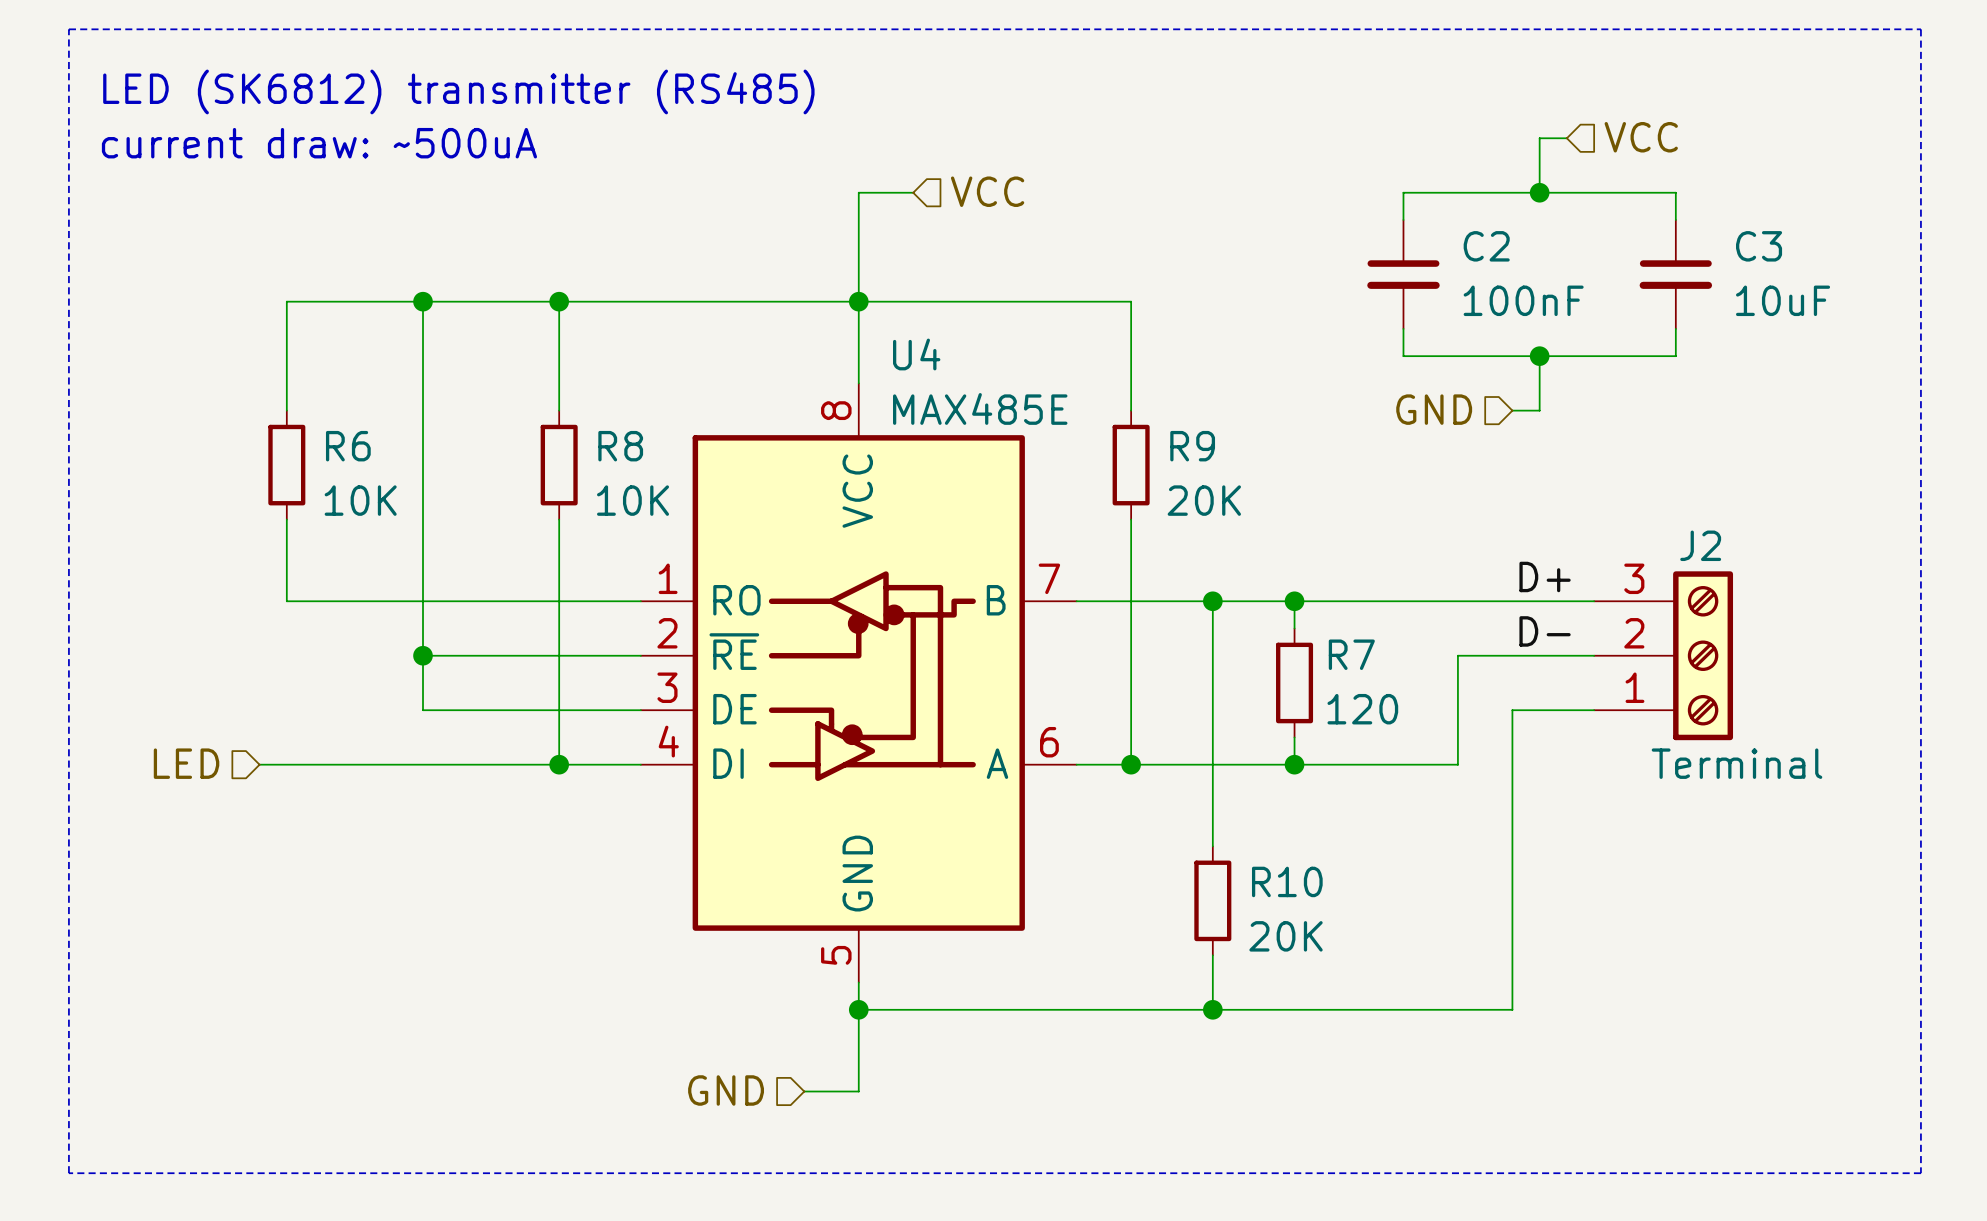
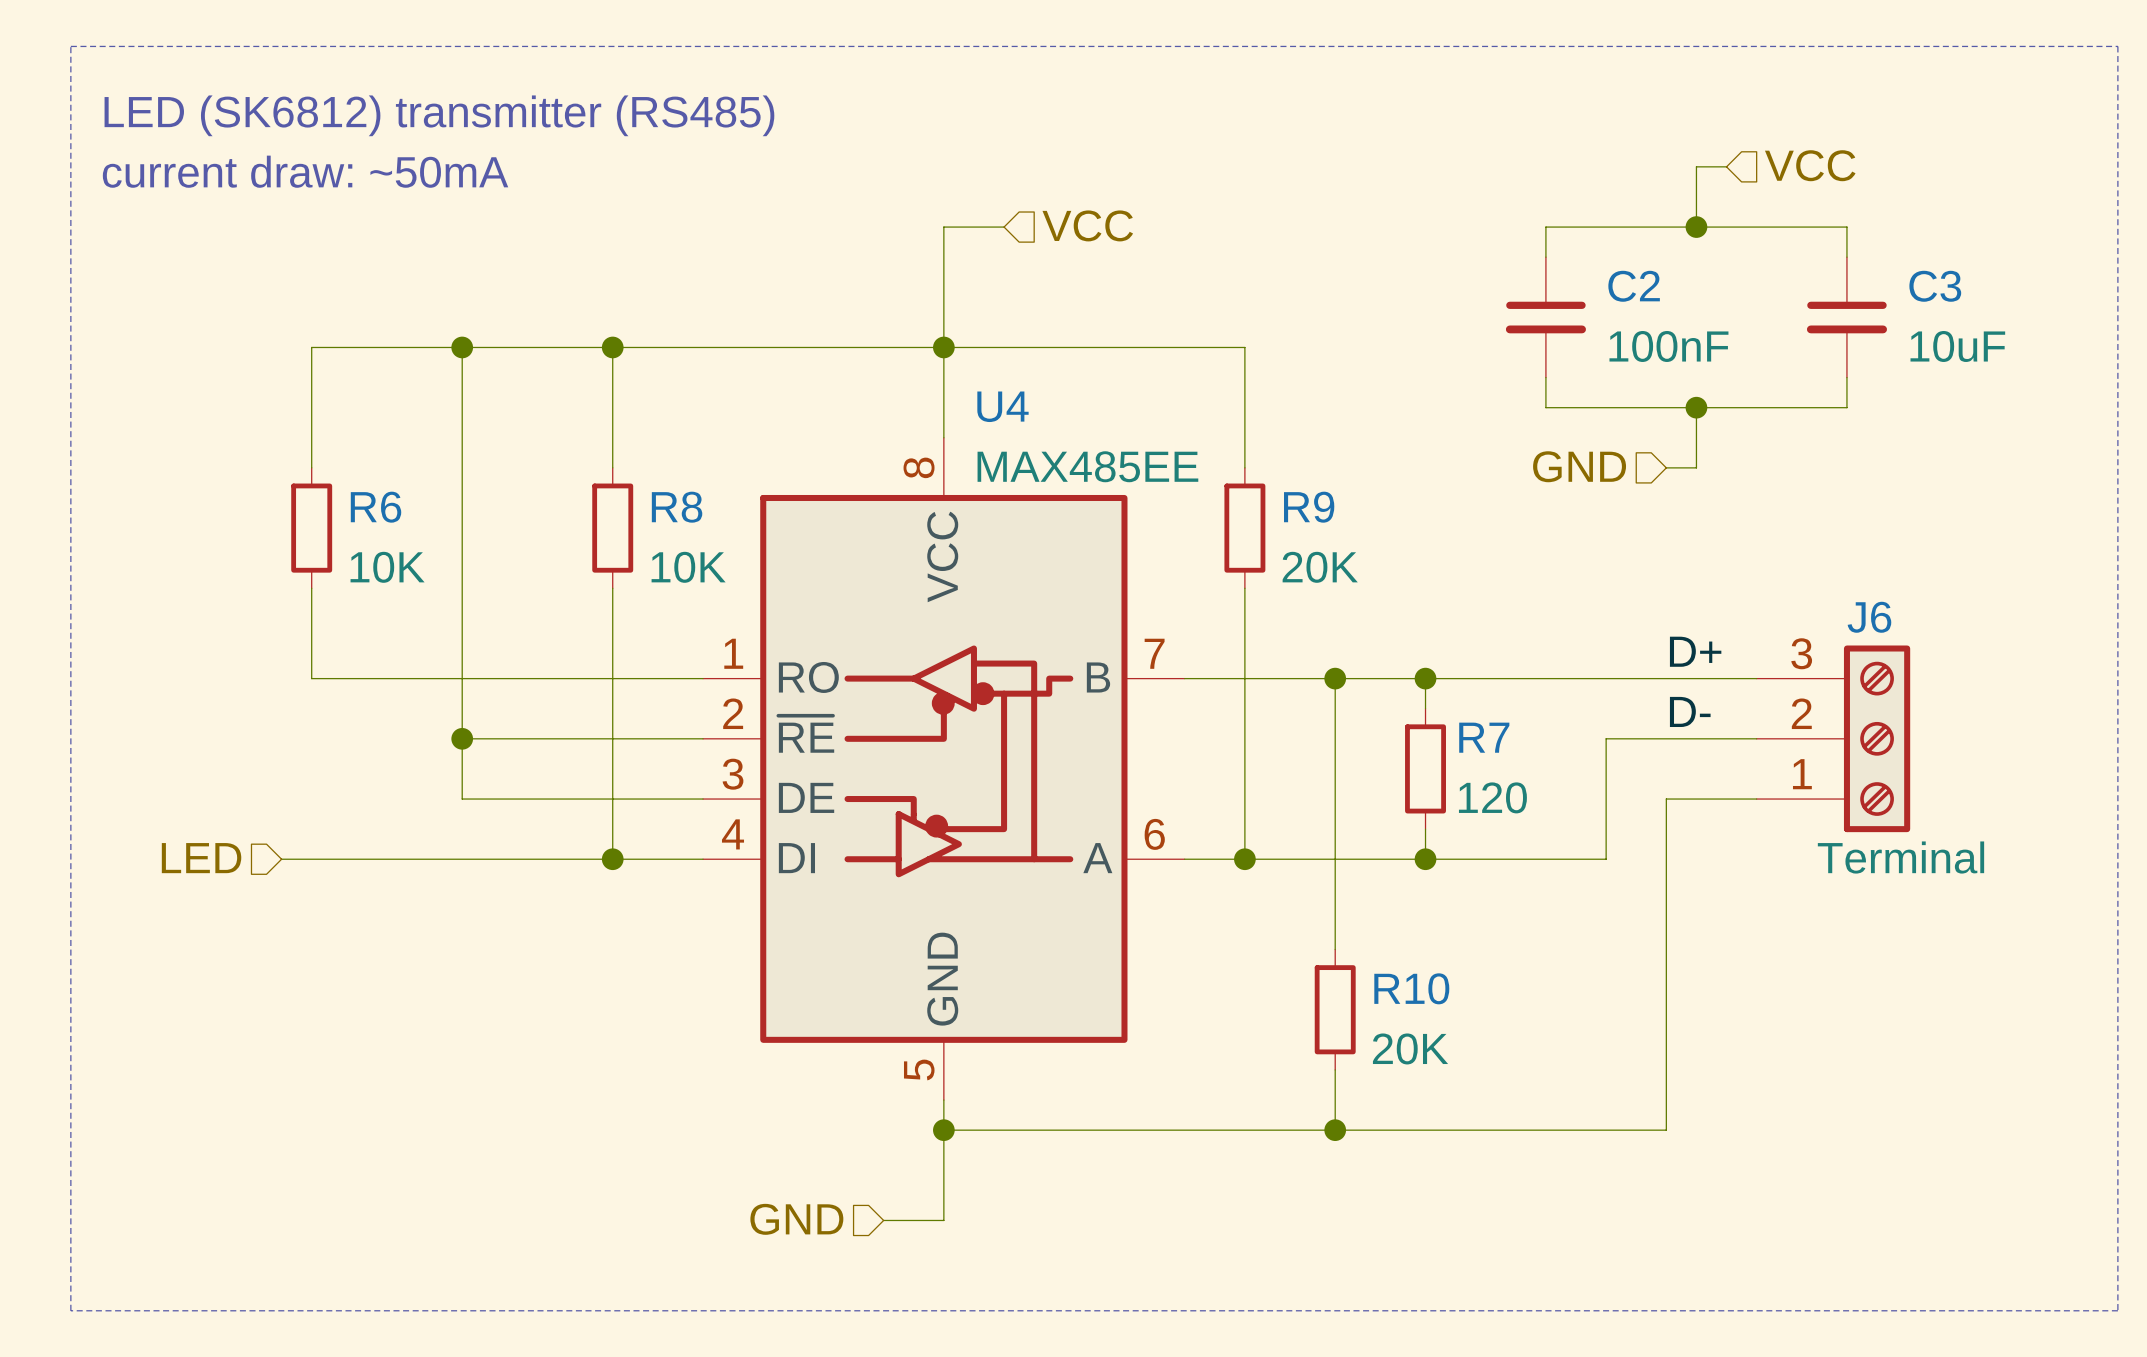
text: current draw: ~500uA (319, 143) -> current draw: ~50mA (305, 171)
U4 value: MAX485E (980, 408) -> MAX485EE (1087, 466)
J2 name: J2 (1700, 545) -> J6 (1869, 617)

